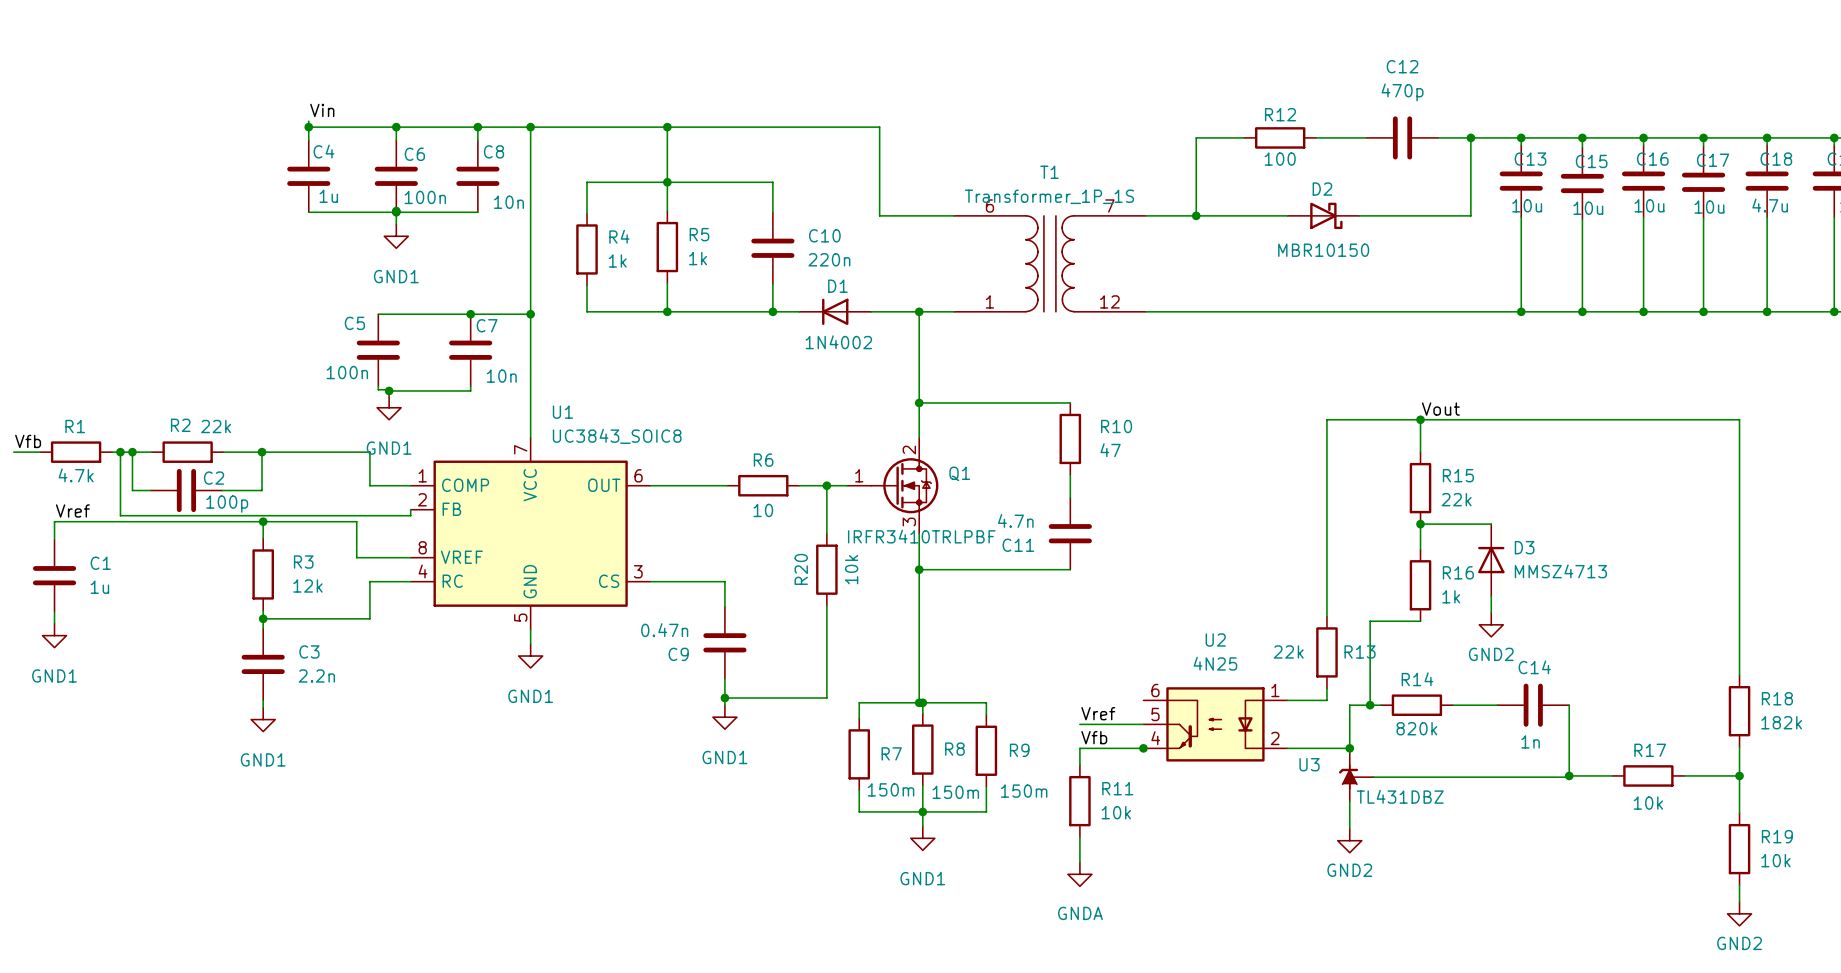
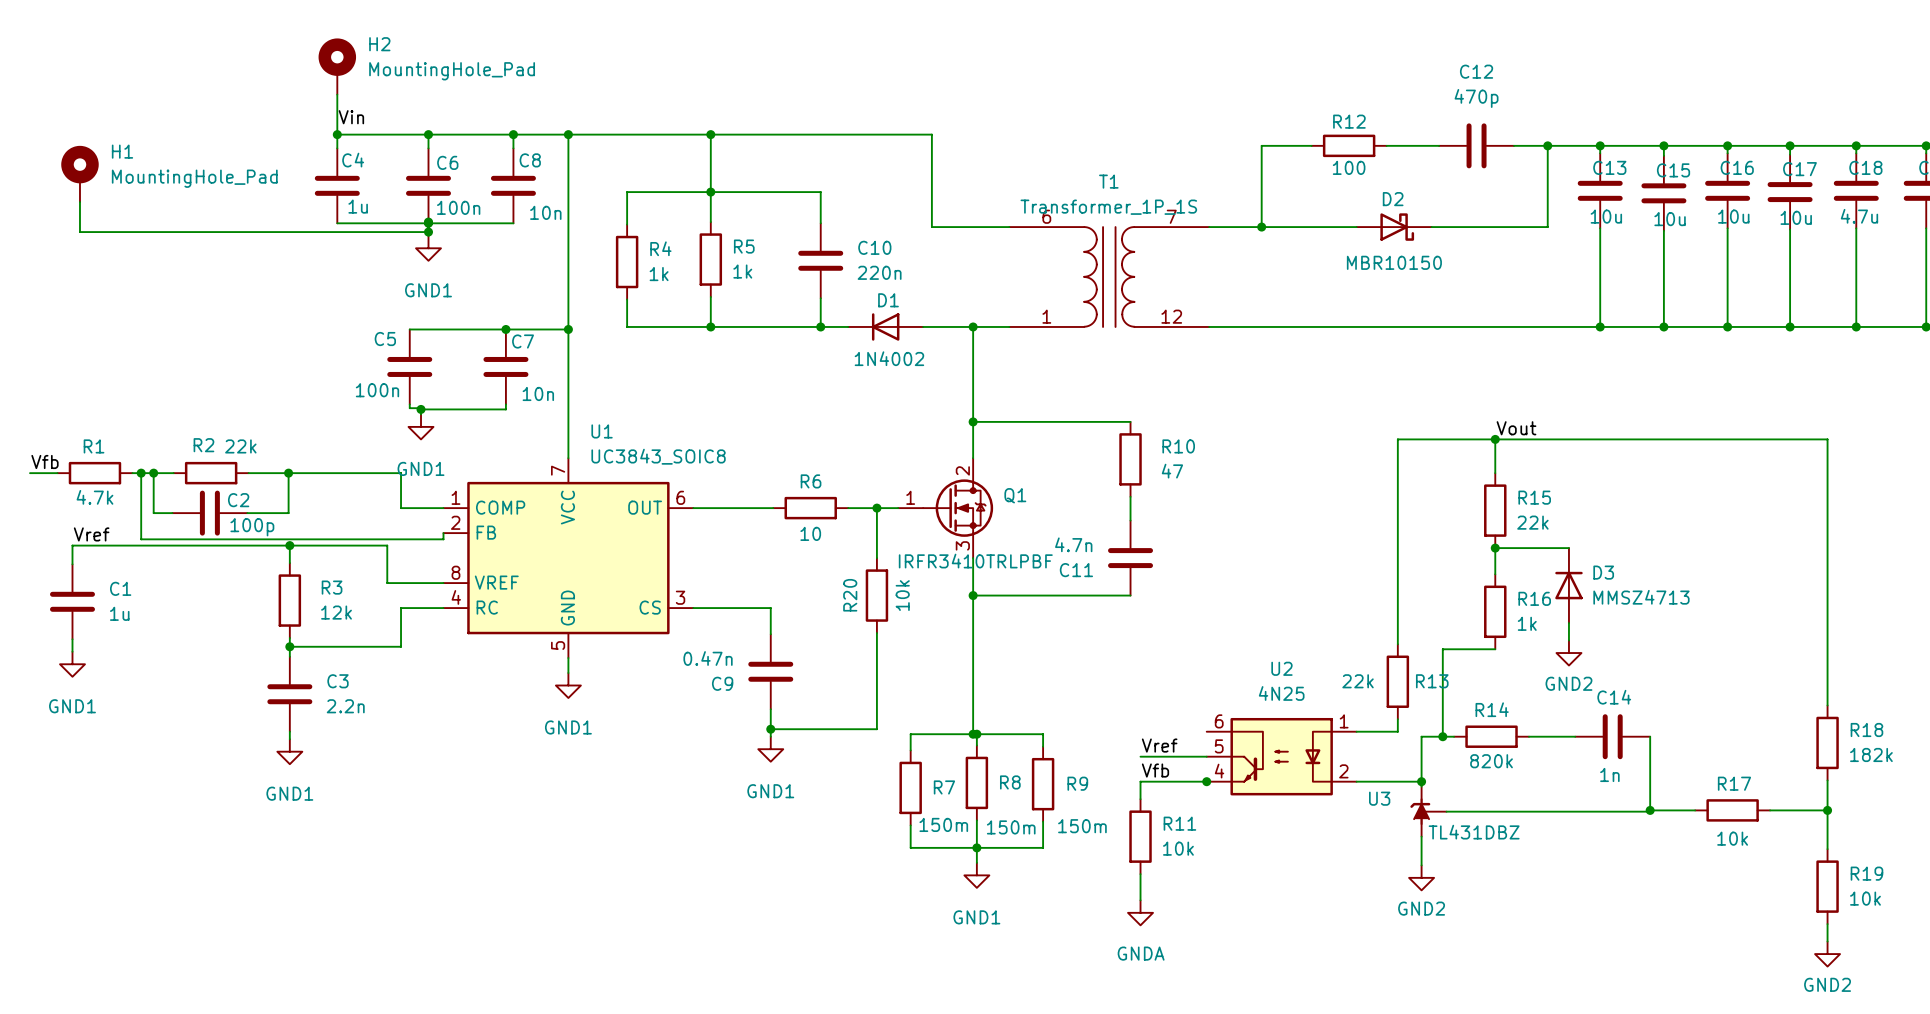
H2: none -> MountingHole_Pad (337, 66)
wire: none -> (337, 94) (337, 128)
H1: none -> MountingHole_Pad (79, 173)
wire: none -> (79, 202) (79, 232) (428, 232)
junction: none -> (428, 232)

